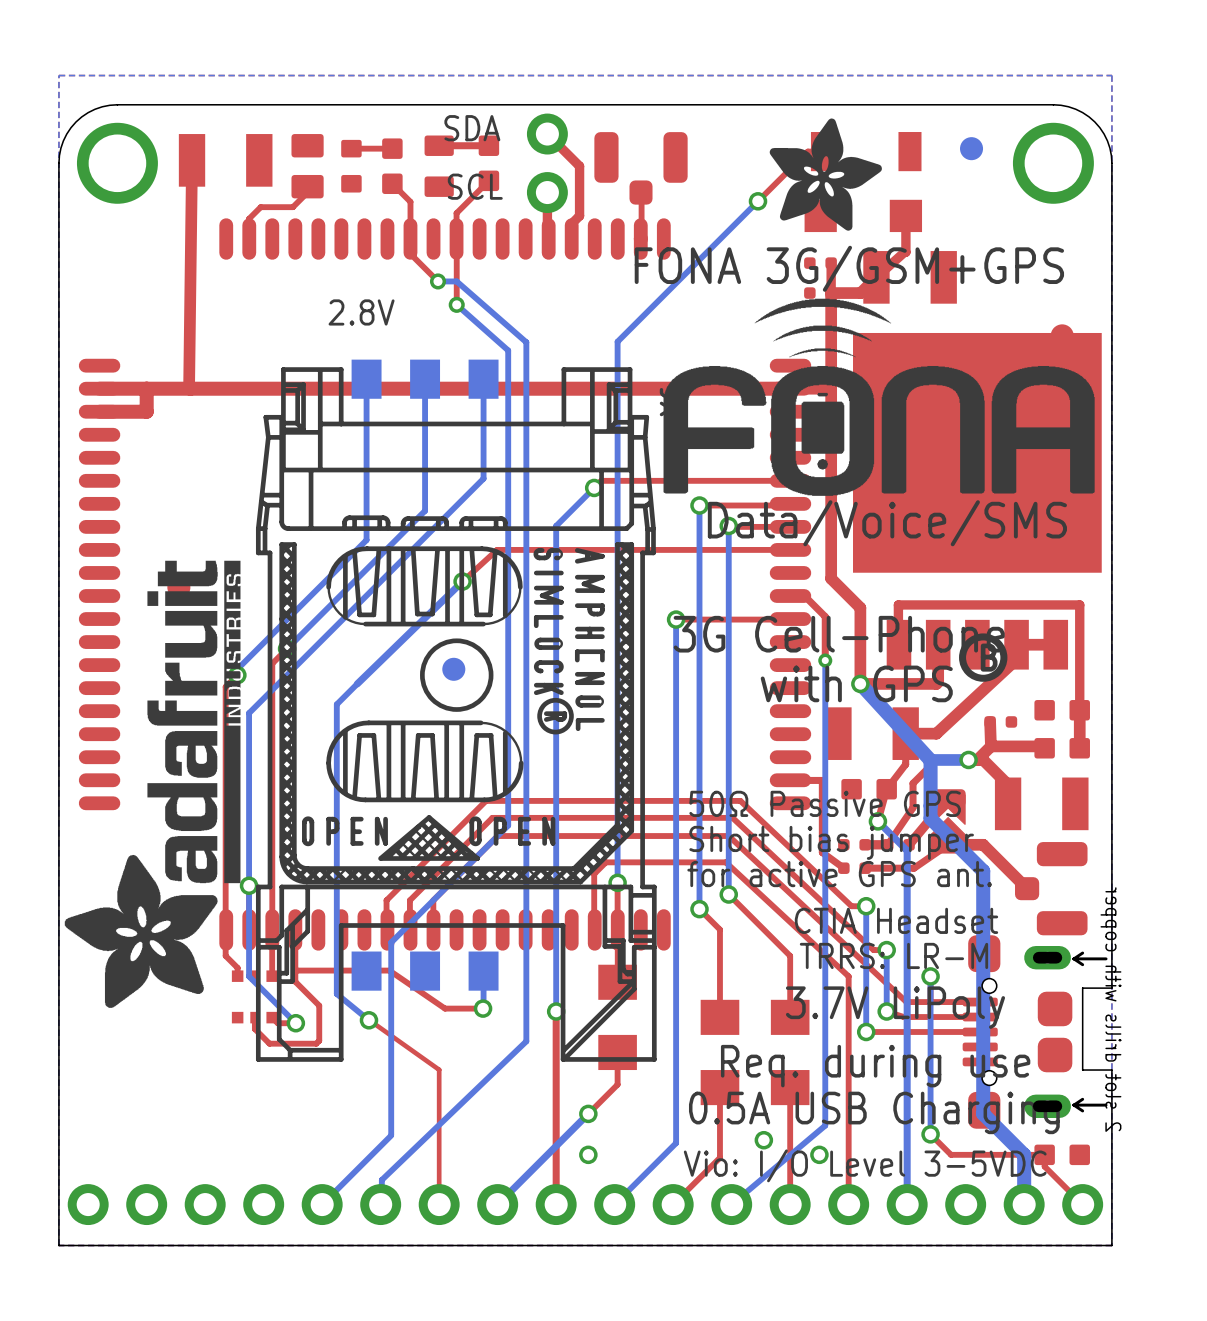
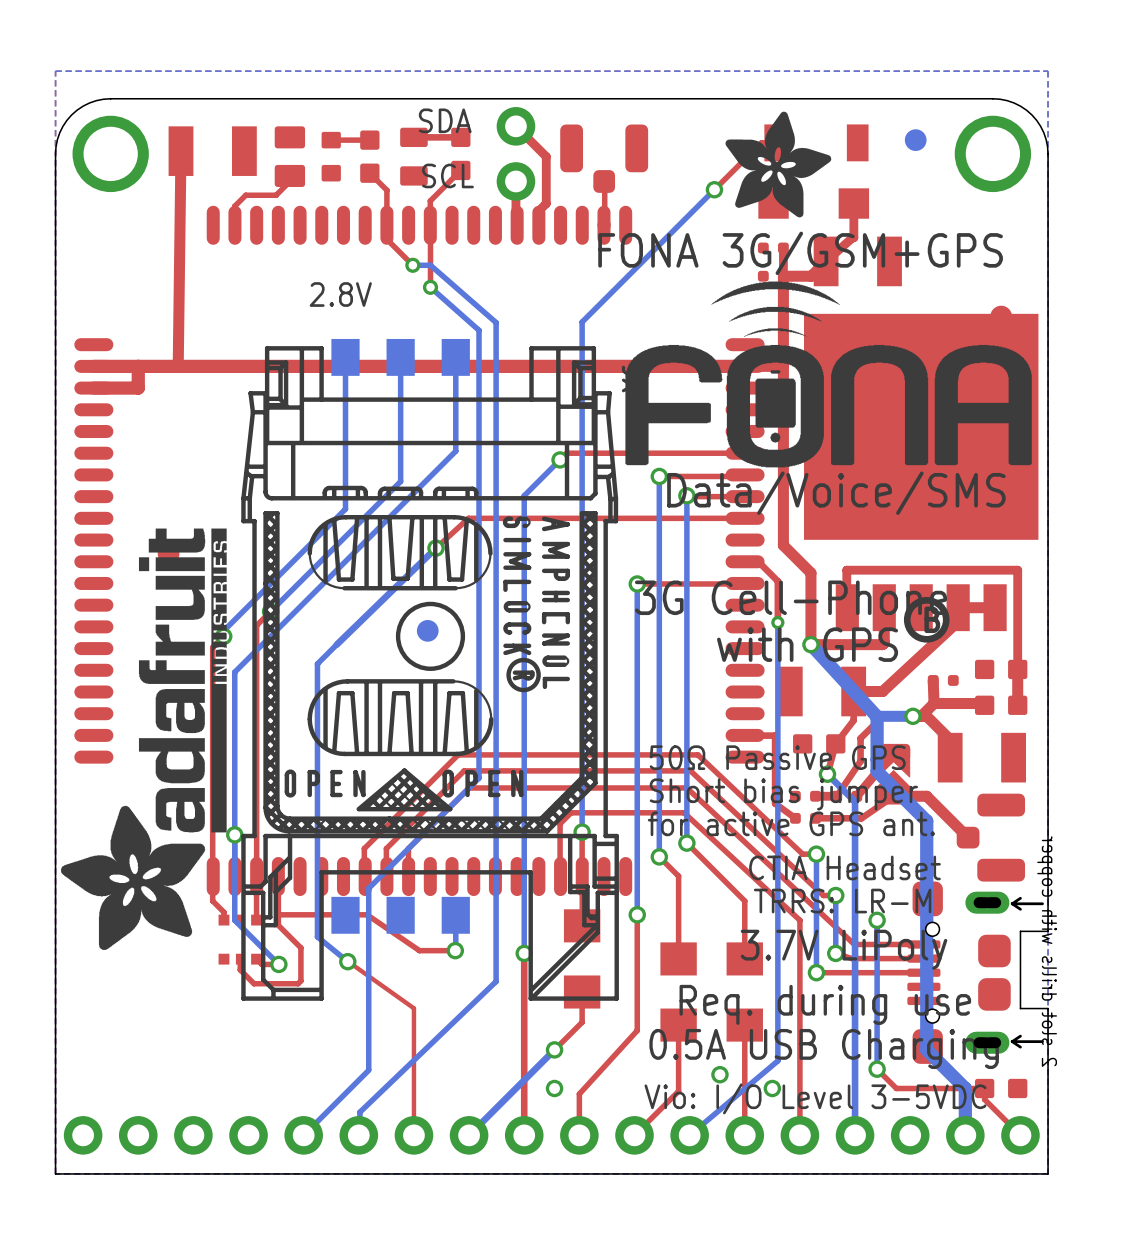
top track: none -> (637, 914) (637, 1030) (579, 1094) (579, 1135)
bottom track: (676, 970) (676, 1143) (614, 1204) -> none
via: none -> (637, 914)

